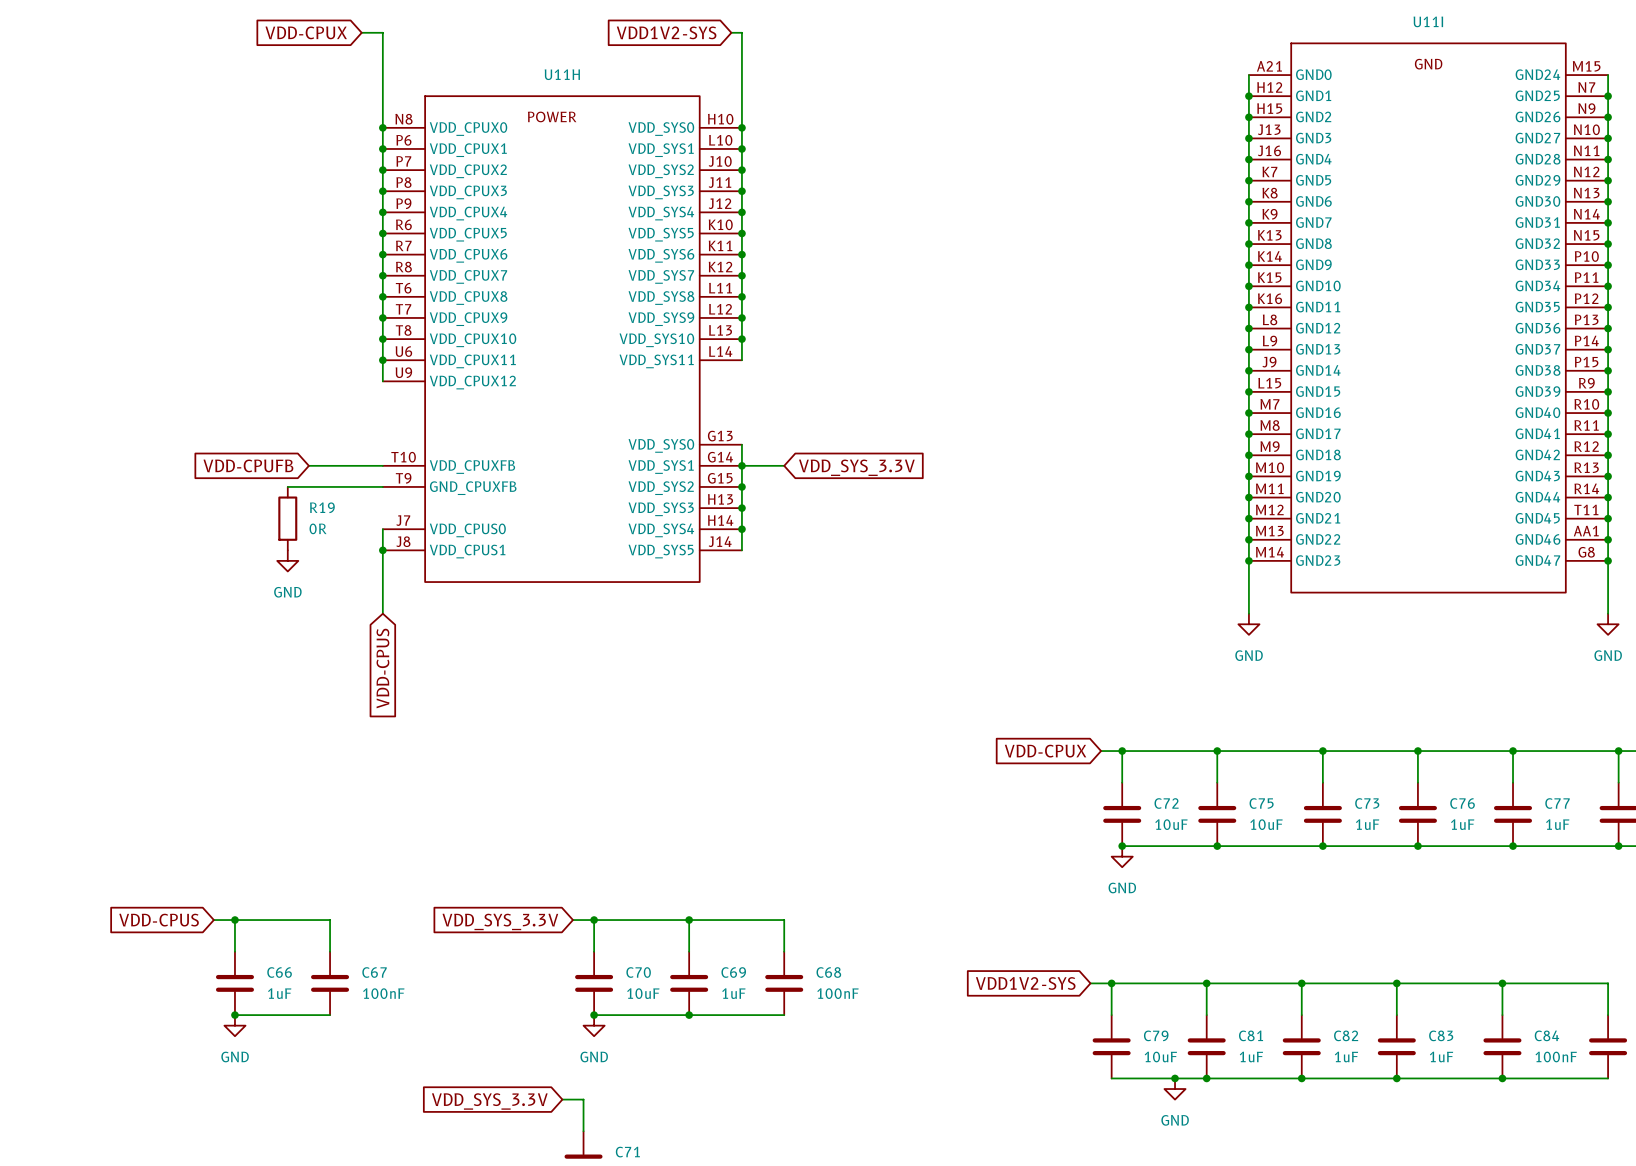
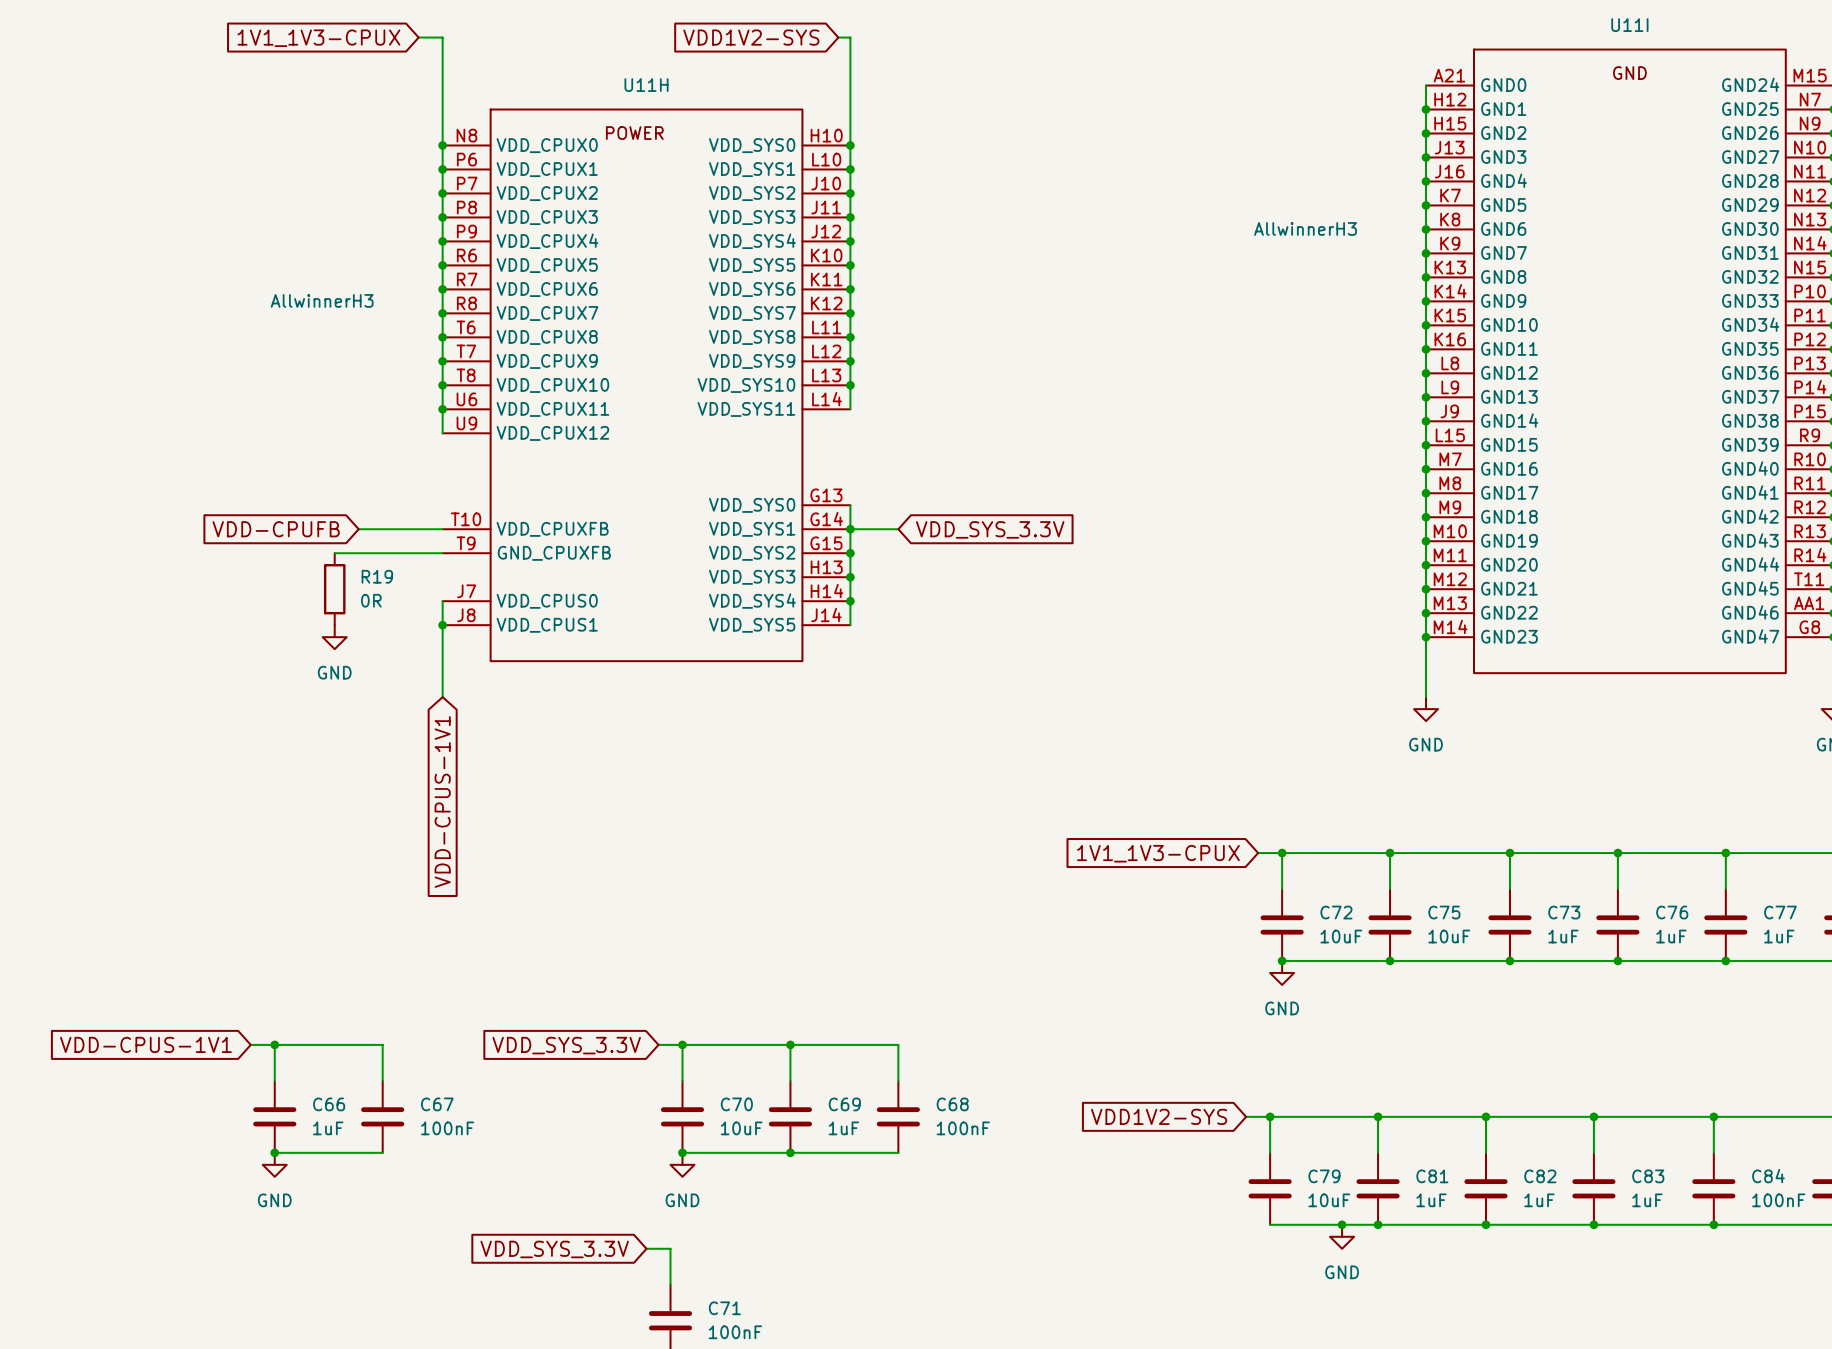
global label: VDD-CPUX (306, 32) -> 1V1_1V3-CPUX (318, 38)
U11I value: none -> AllwinnerH3 (1305, 228)
U11H value: none -> AllwinnerH3 (322, 300)
global label: VDD-CPUS (382, 668) -> VDD-CPUS-1V1 (442, 801)
global label: VDD-CPUX (1045, 751) -> 1V1_1V3-CPUX (1158, 853)
global label: VDD-CPUS (159, 920) -> VDD-CPUS-1V1 (145, 1044)

